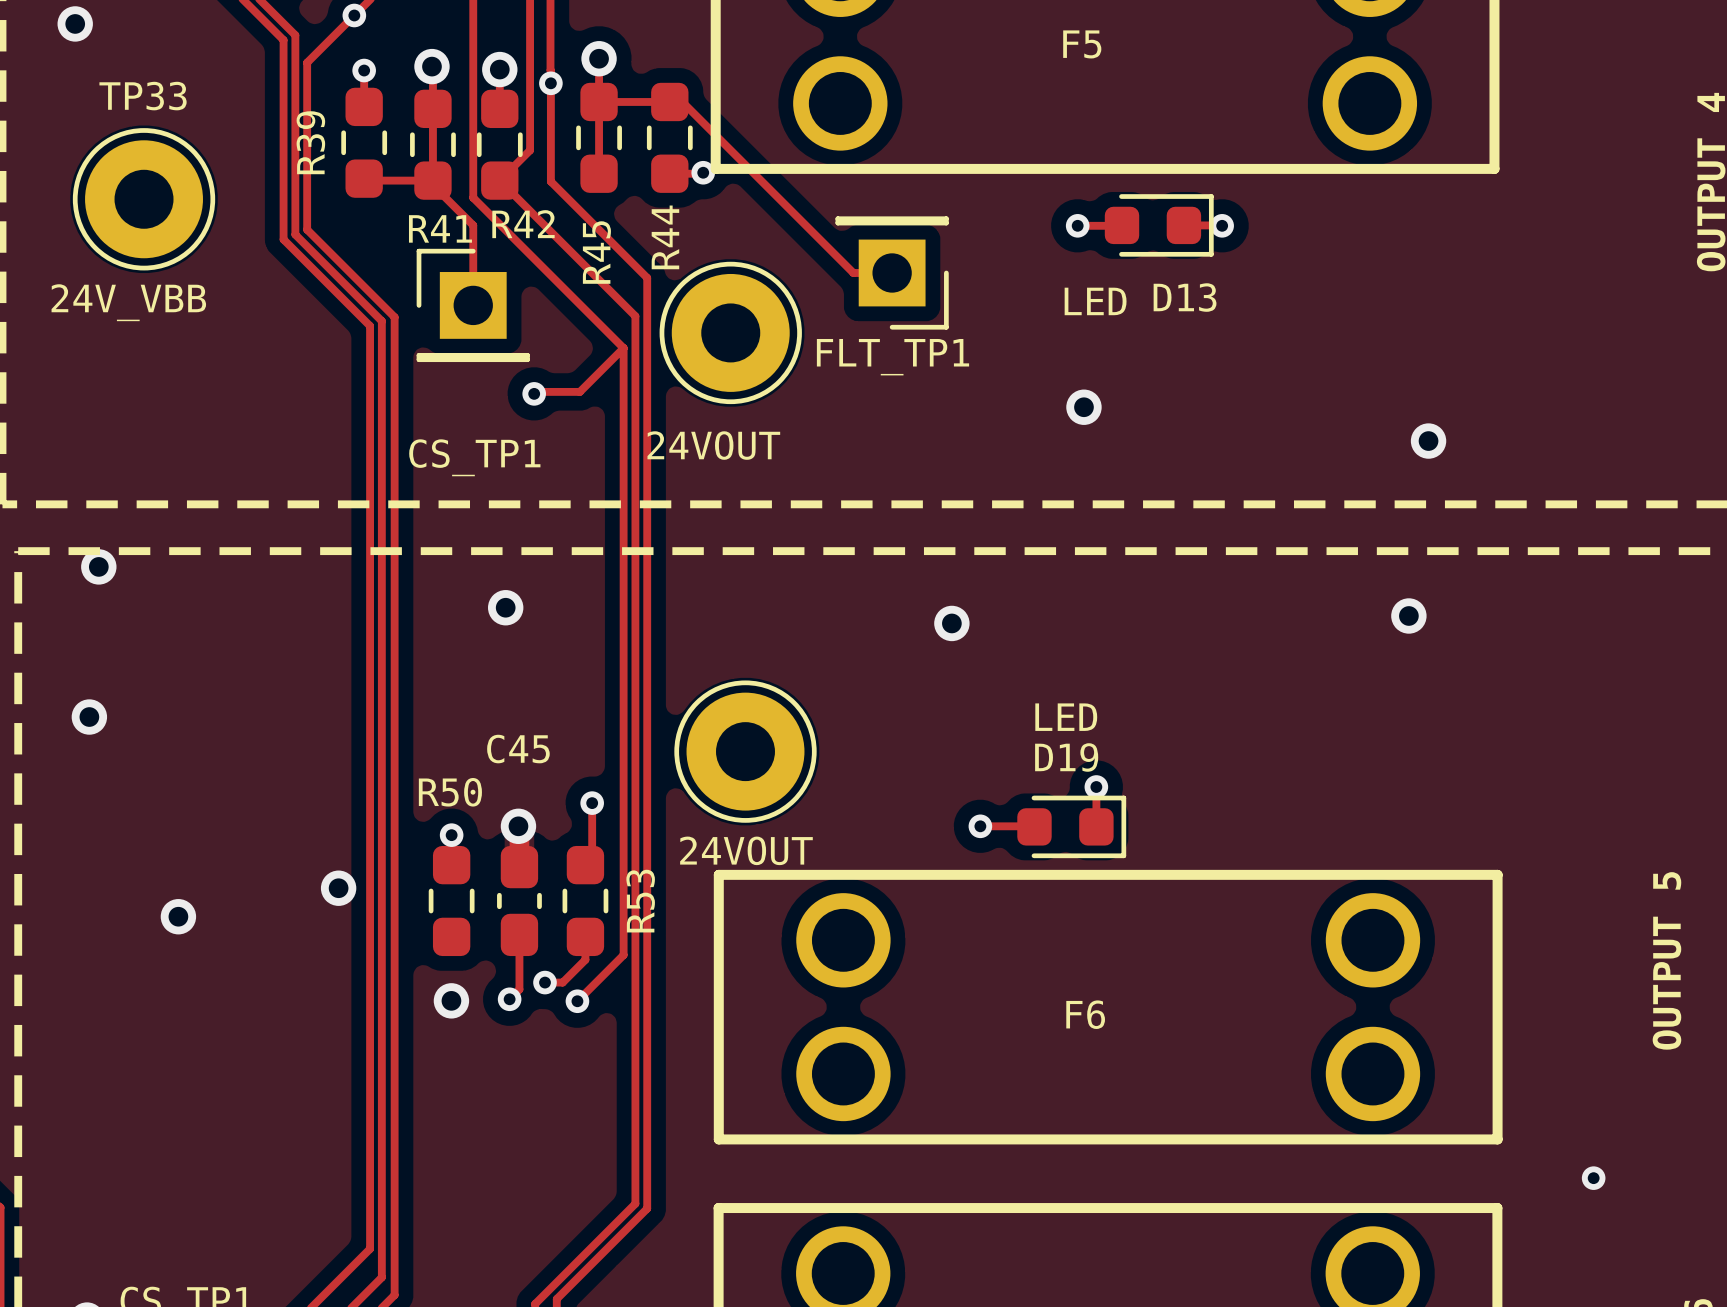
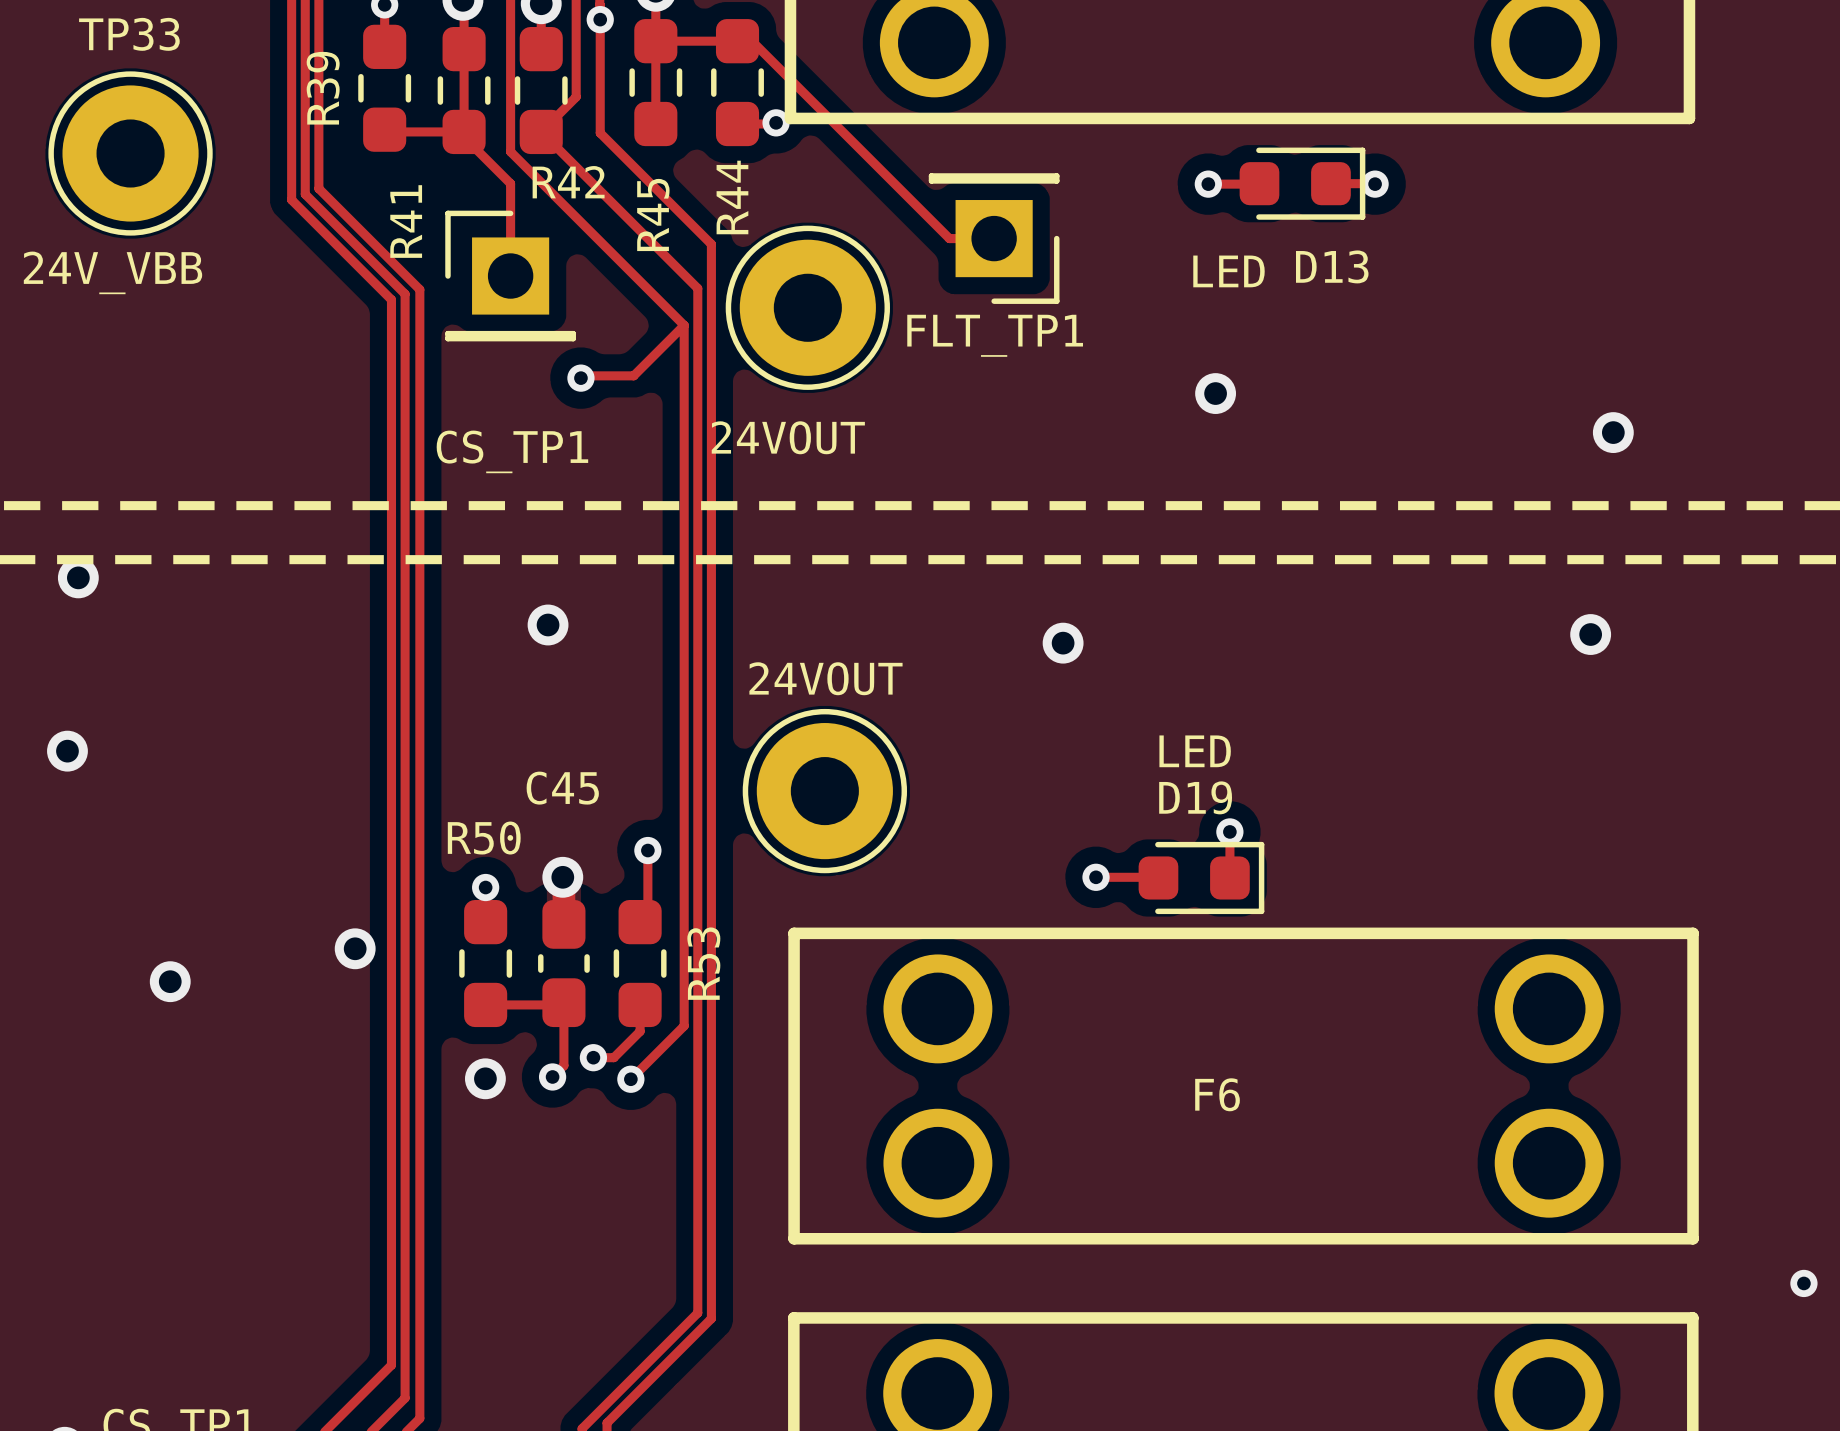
R41 name rotation: 0° (440, 228) -> 90° counterclockwise (406, 221)
part value position: 24VOUT (746, 850) -> 24VOUT (825, 678)
track: none -> (563, 1002) (561, 1004) (485, 1004)

